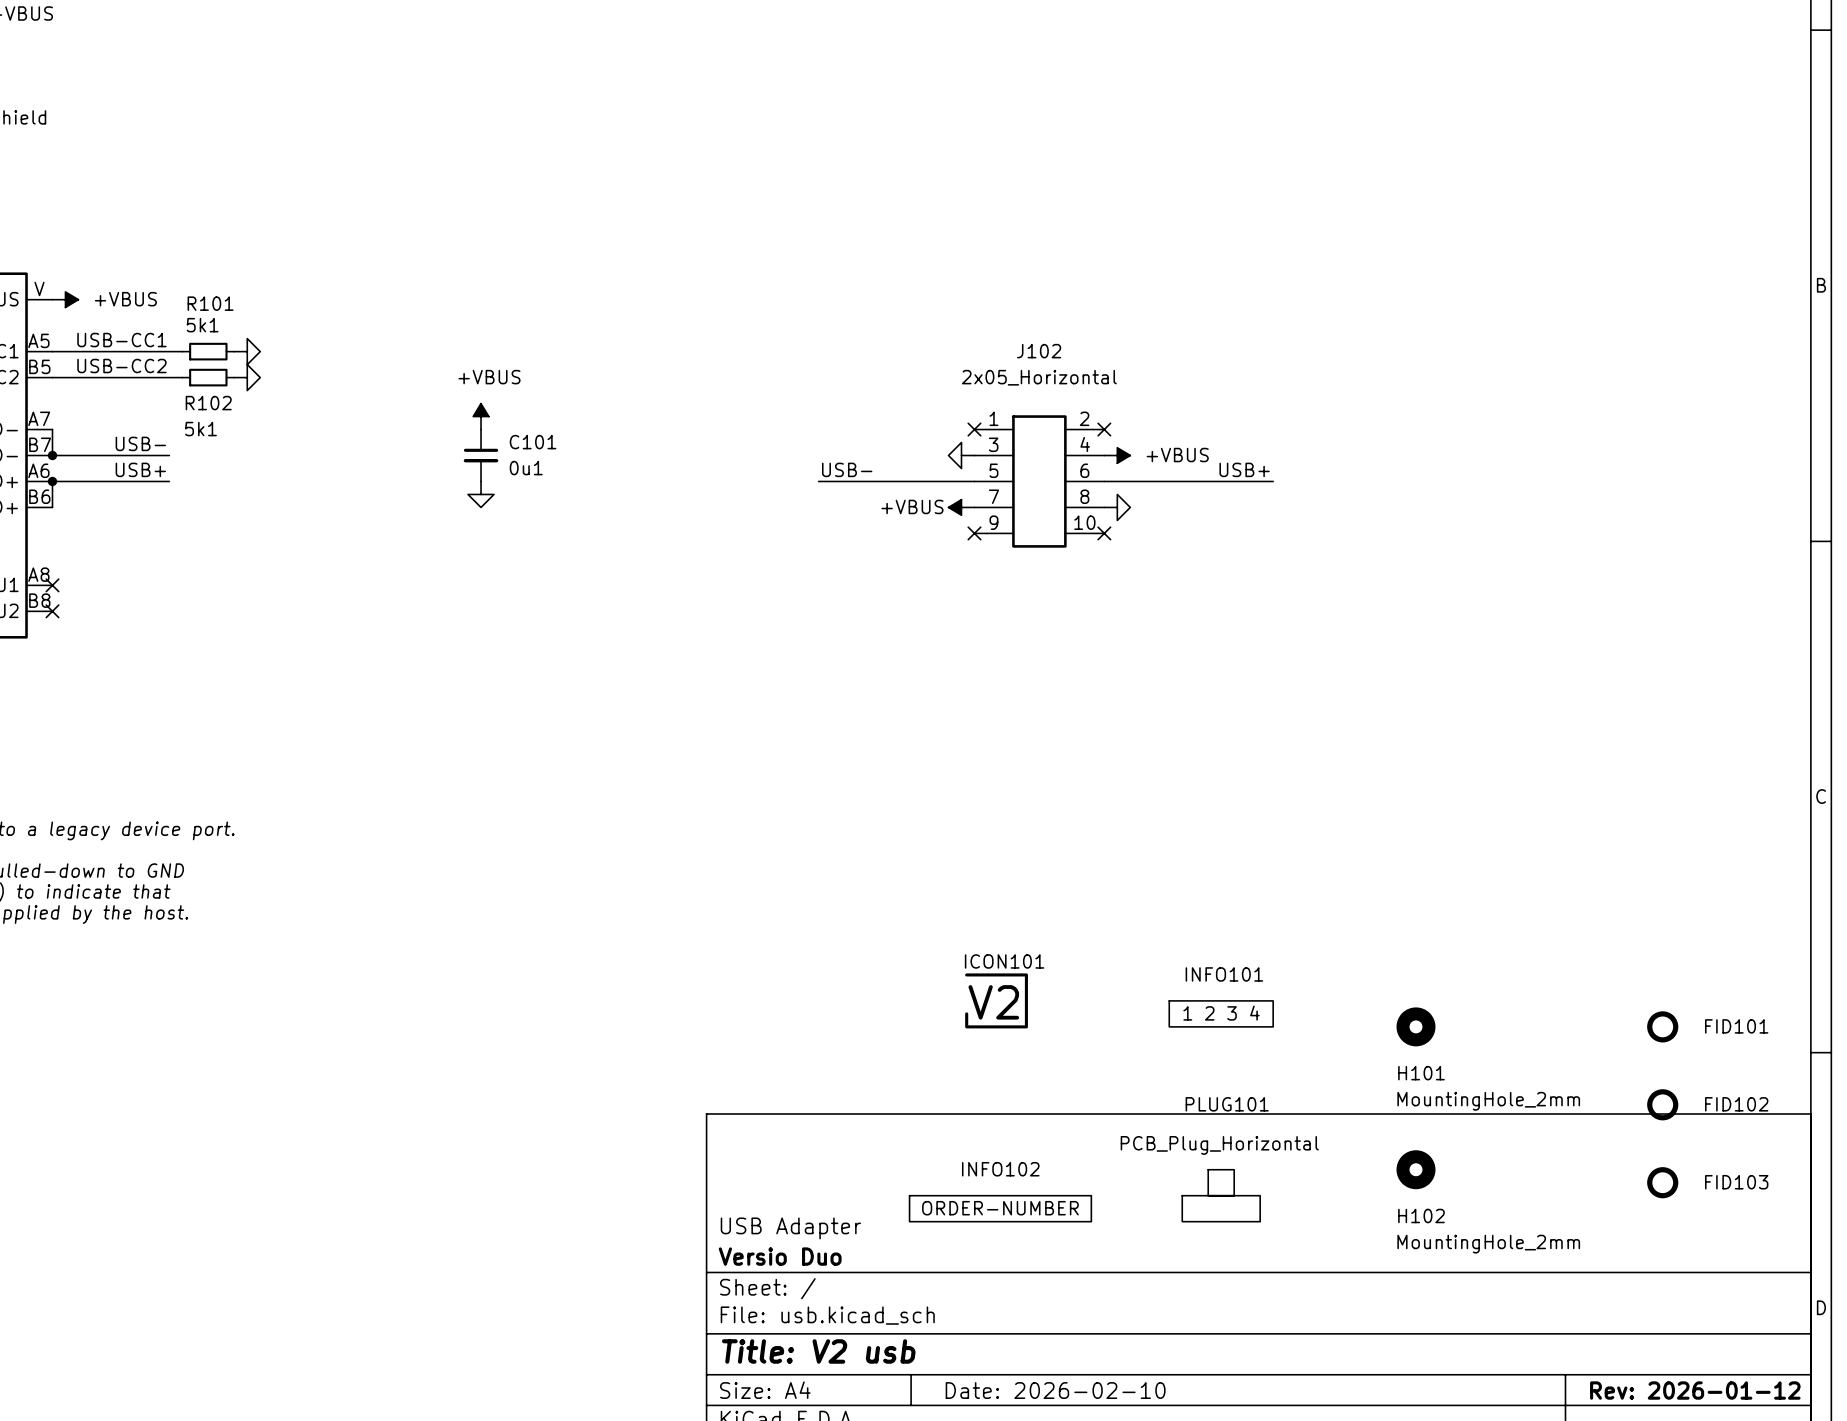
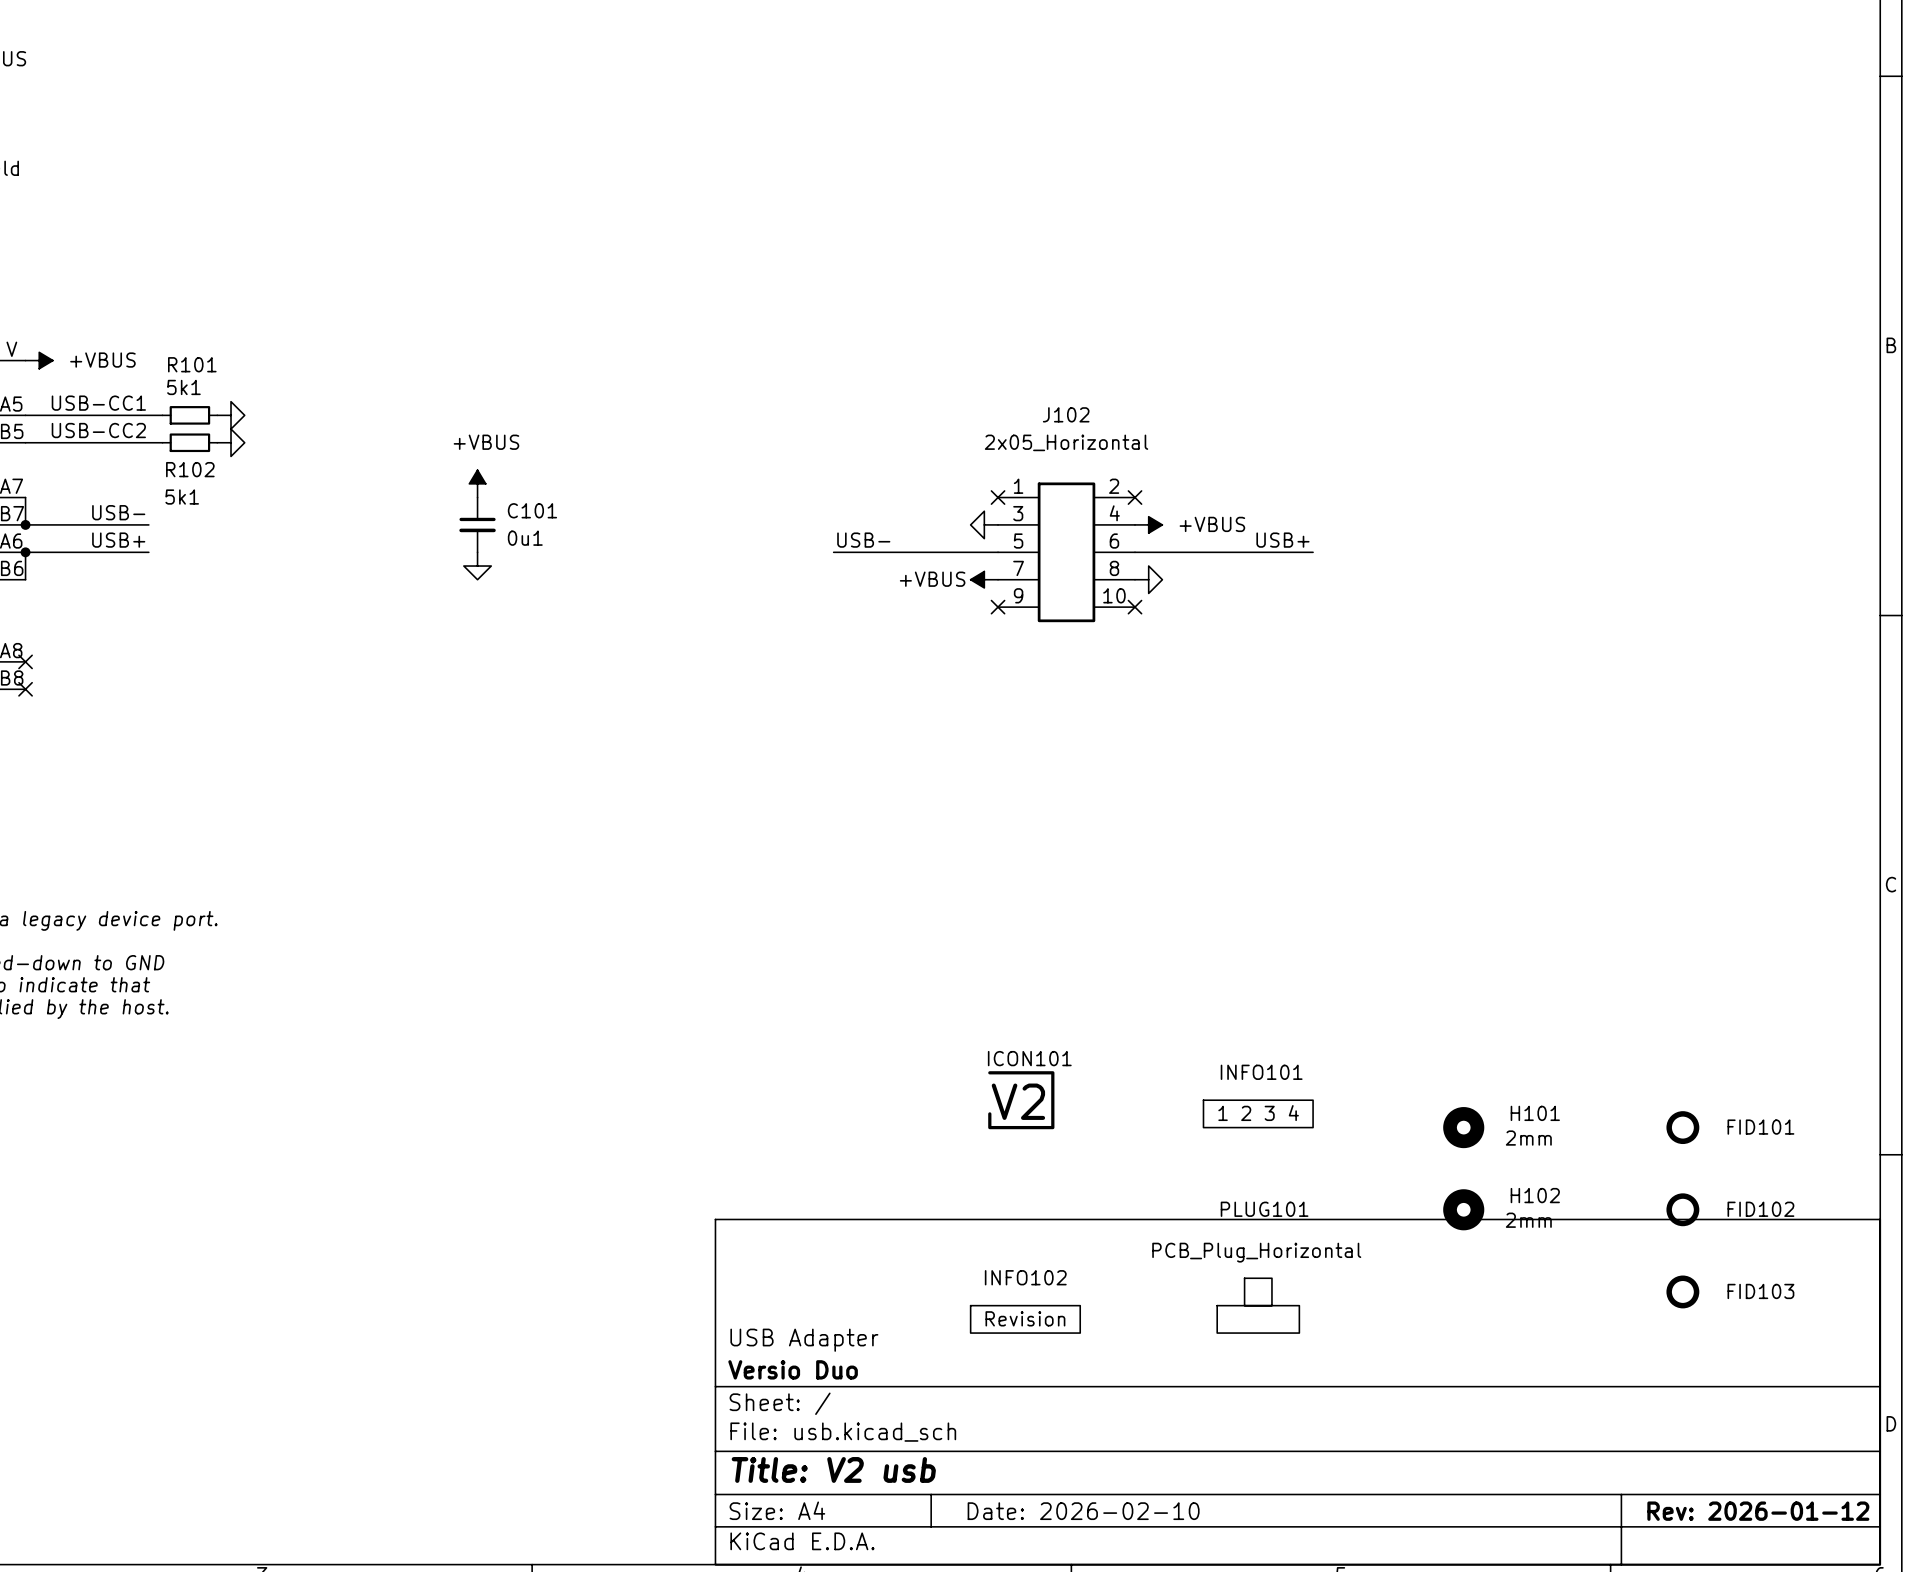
FID101 position: (1662, 1026) -> (1682, 1127)
H101 name position: H101 (1421, 1073) -> H101 (1535, 1113)
H101 value: MountingHole_2mm (1488, 1101) -> 2mm (1528, 1138)
FID102 position: (1662, 1104) -> (1682, 1209)
H102 position: (1416, 1169) -> (1463, 1209)
FID103 position: (1662, 1182) -> (1682, 1291)
INFO102 symbol: [909, 1195, 1092, 1222] -> [970, 1305, 1081, 1334]
H102 name position: H102 (1421, 1215) -> H102 (1535, 1195)
H102 value: MountingHole_2mm (1488, 1244) -> 2mm (1528, 1220)

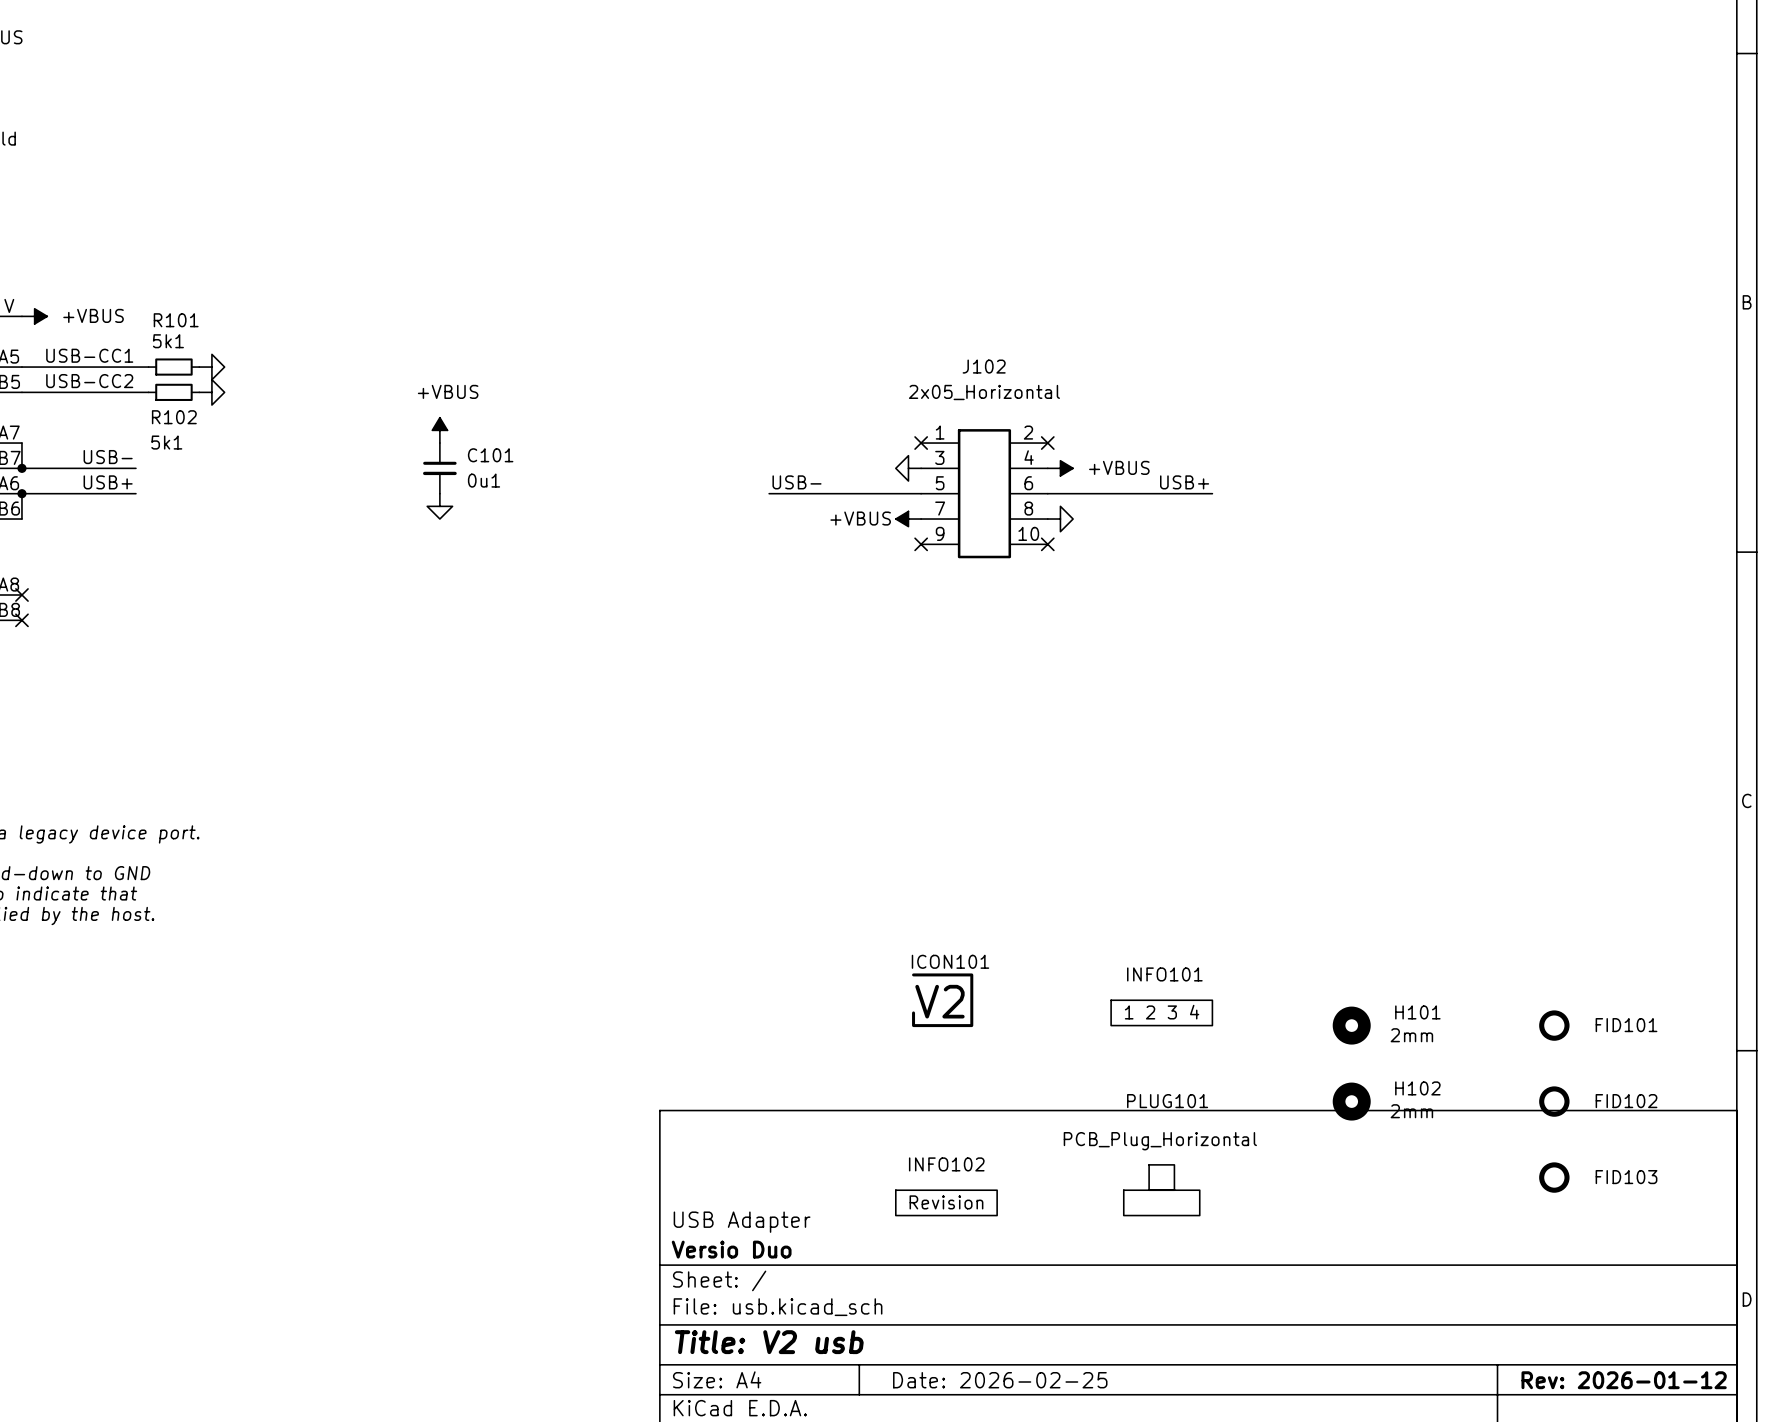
title block: Date: 2026-02-10 (1083, 1511) -> Date: 2026-02-25 (1000, 1380)

